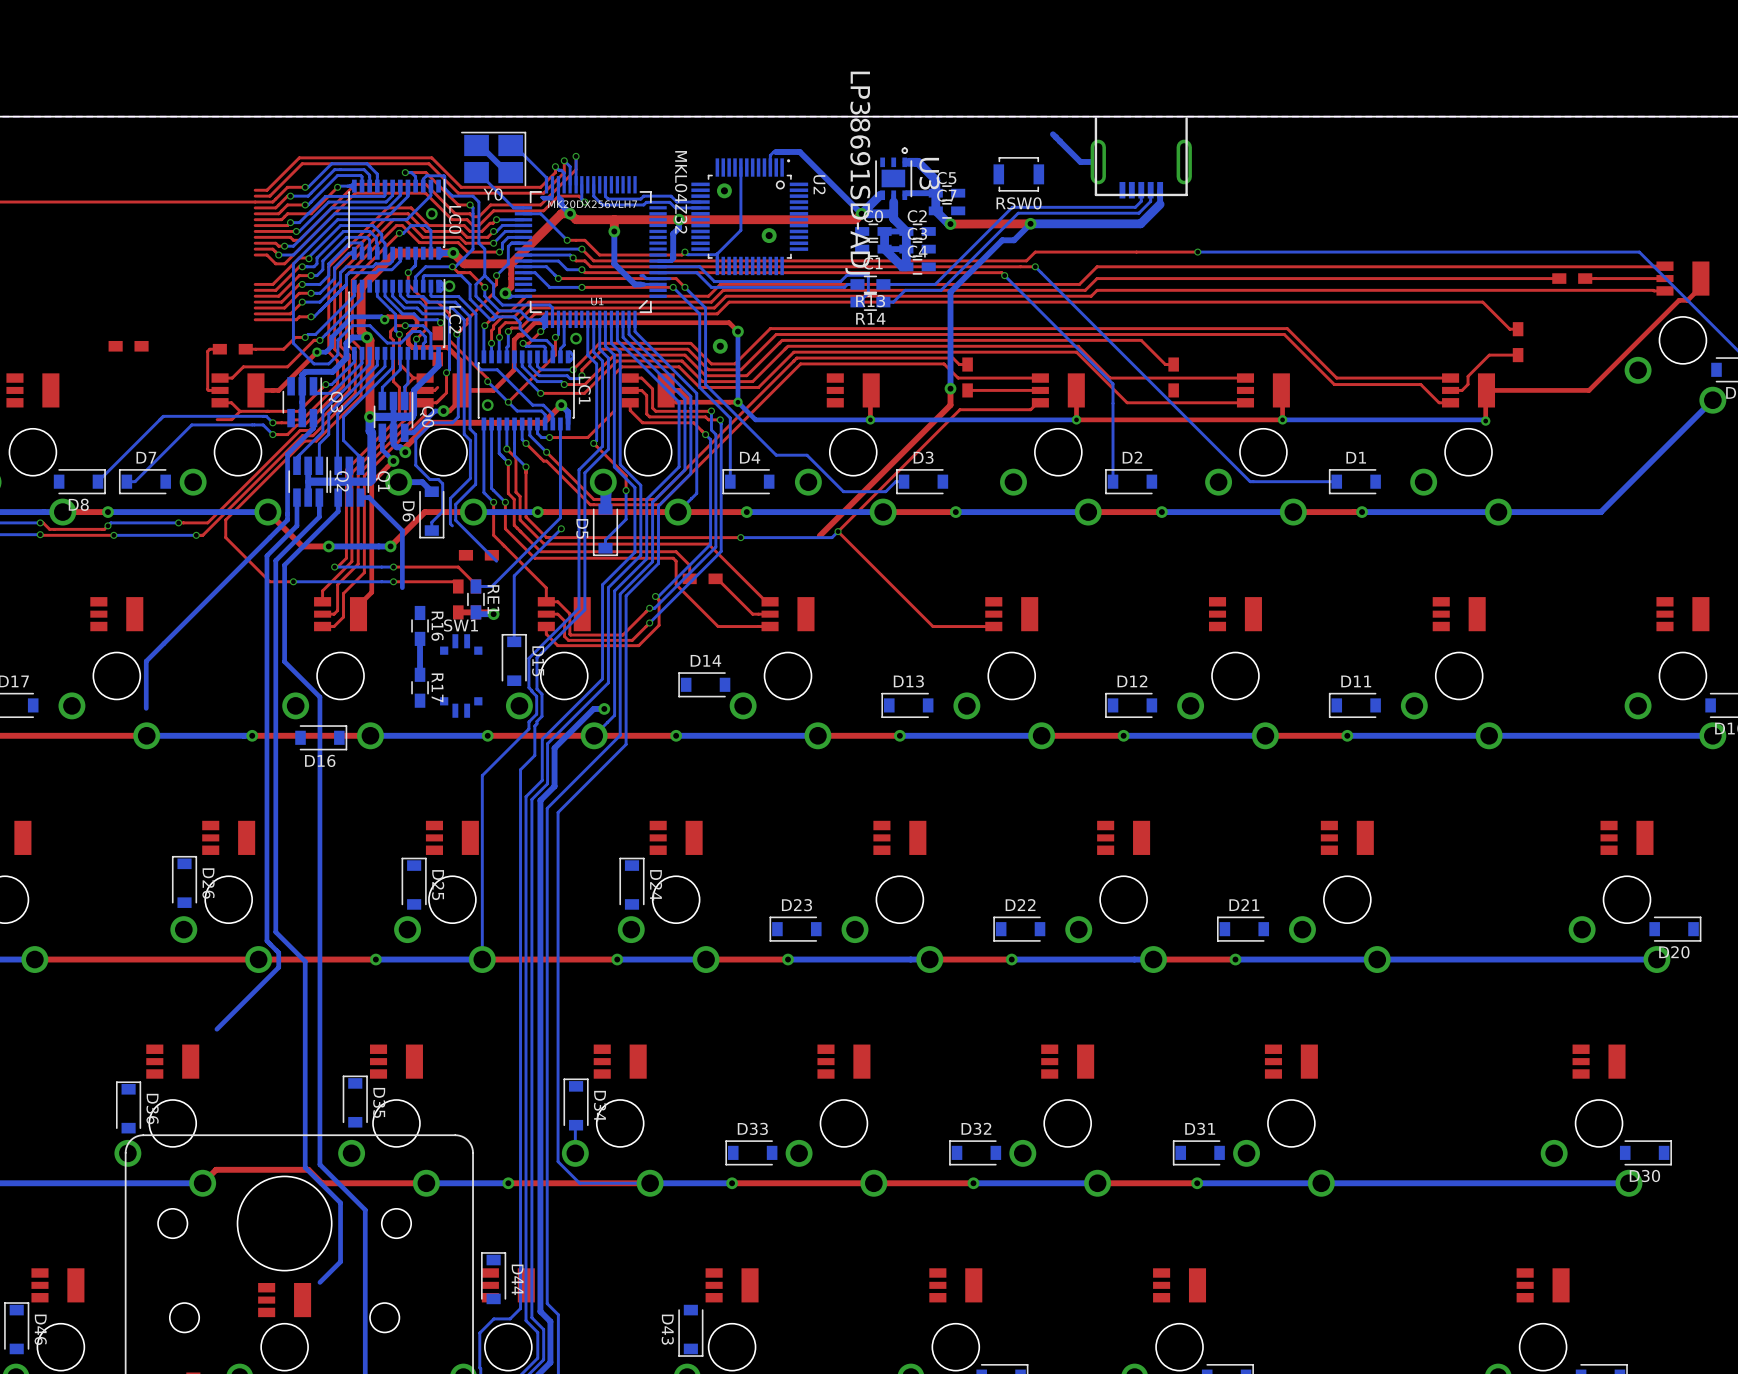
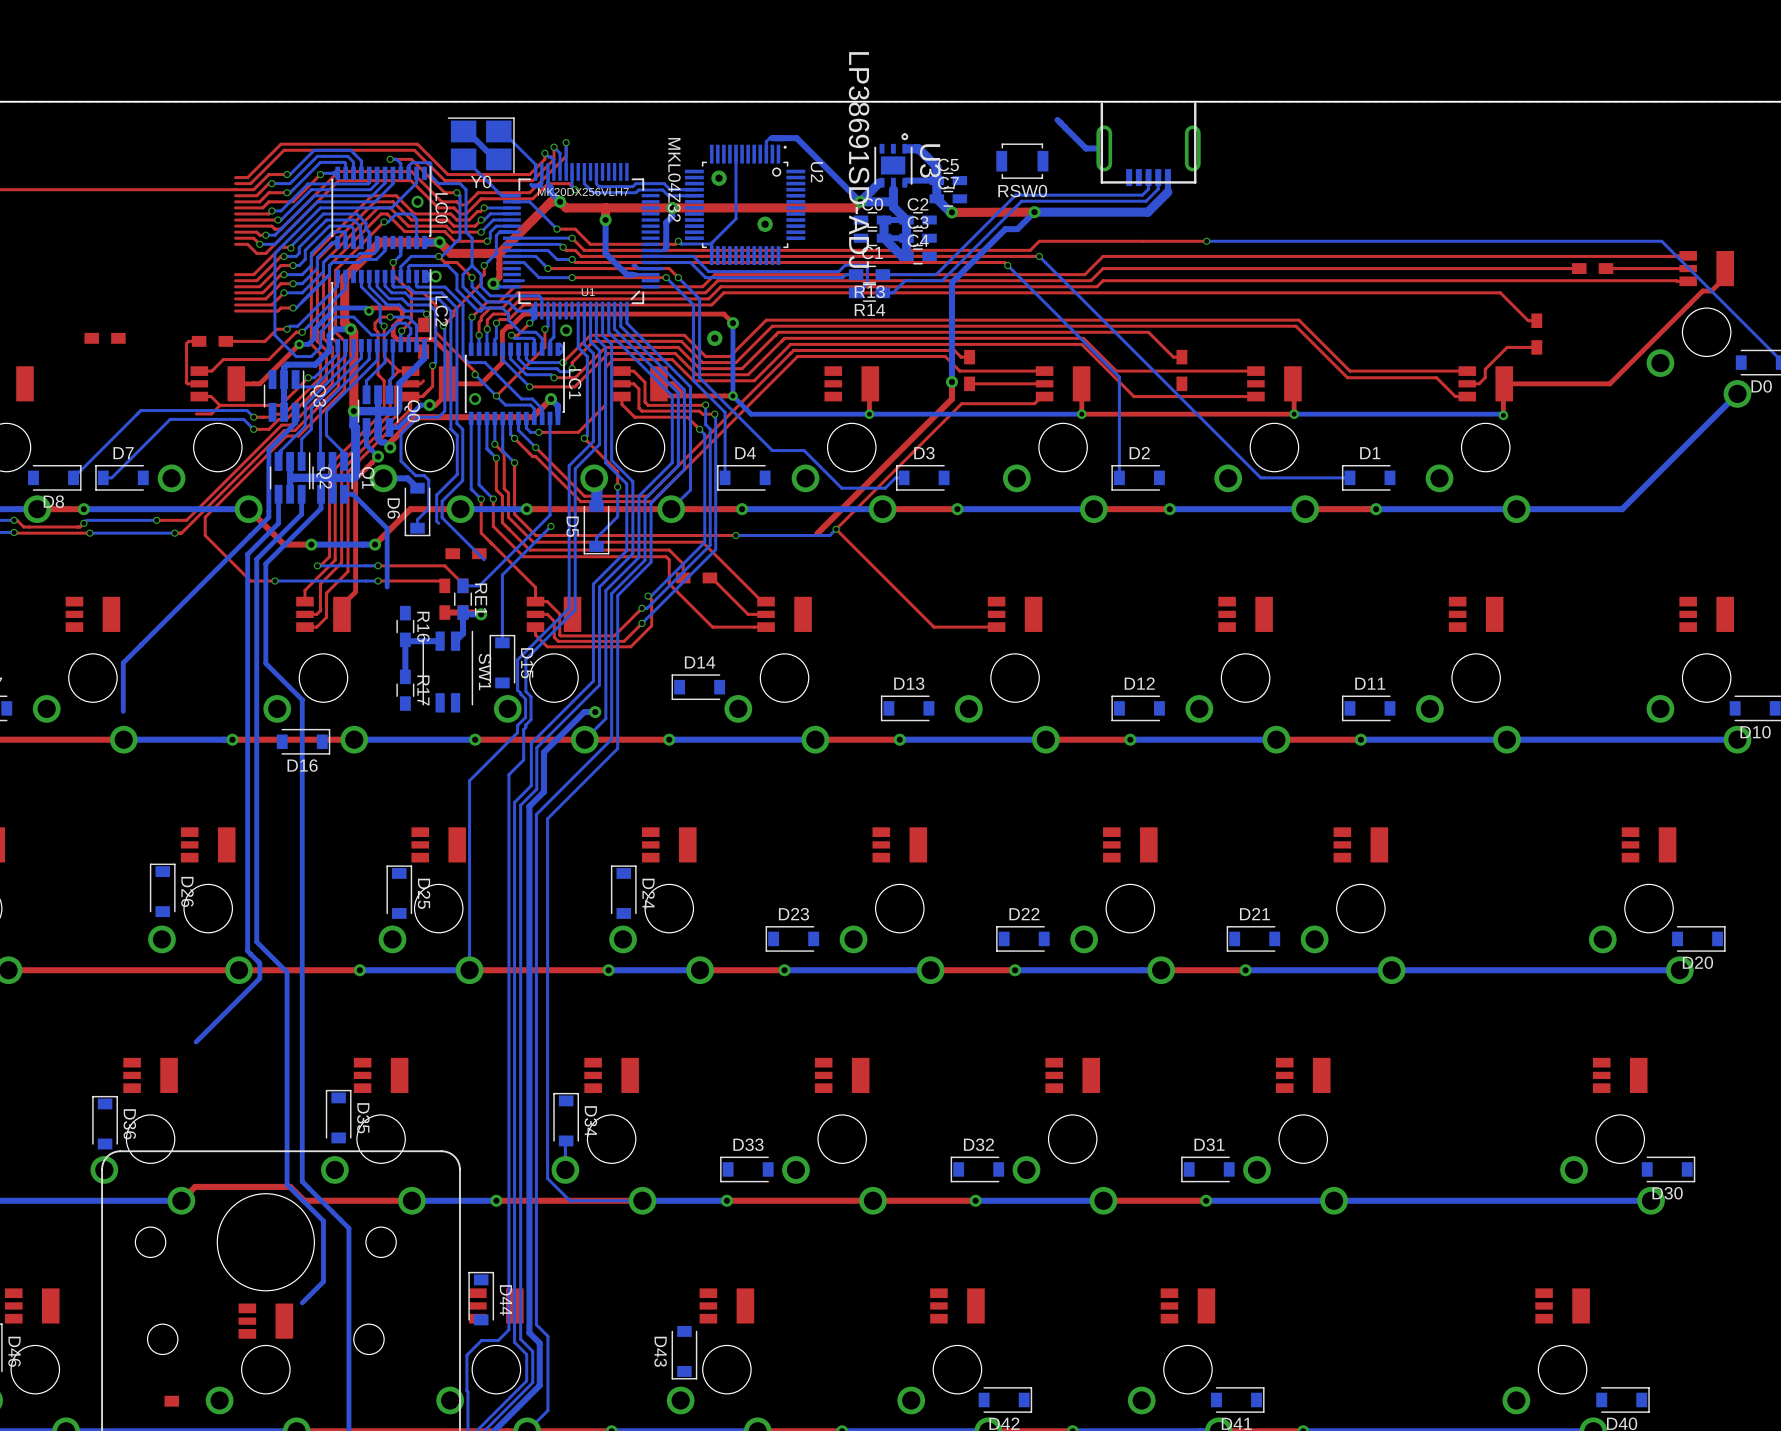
bottom track: none -> (463, 612) (463, 633) (455, 641)
SW1 name position: SW1 (461, 625) -> SW1 (485, 671)
SW1 footprint: [440, 634, 483, 718] -> [422, 630, 474, 713]
bottom track: none -> (440, 641) (406, 641)

